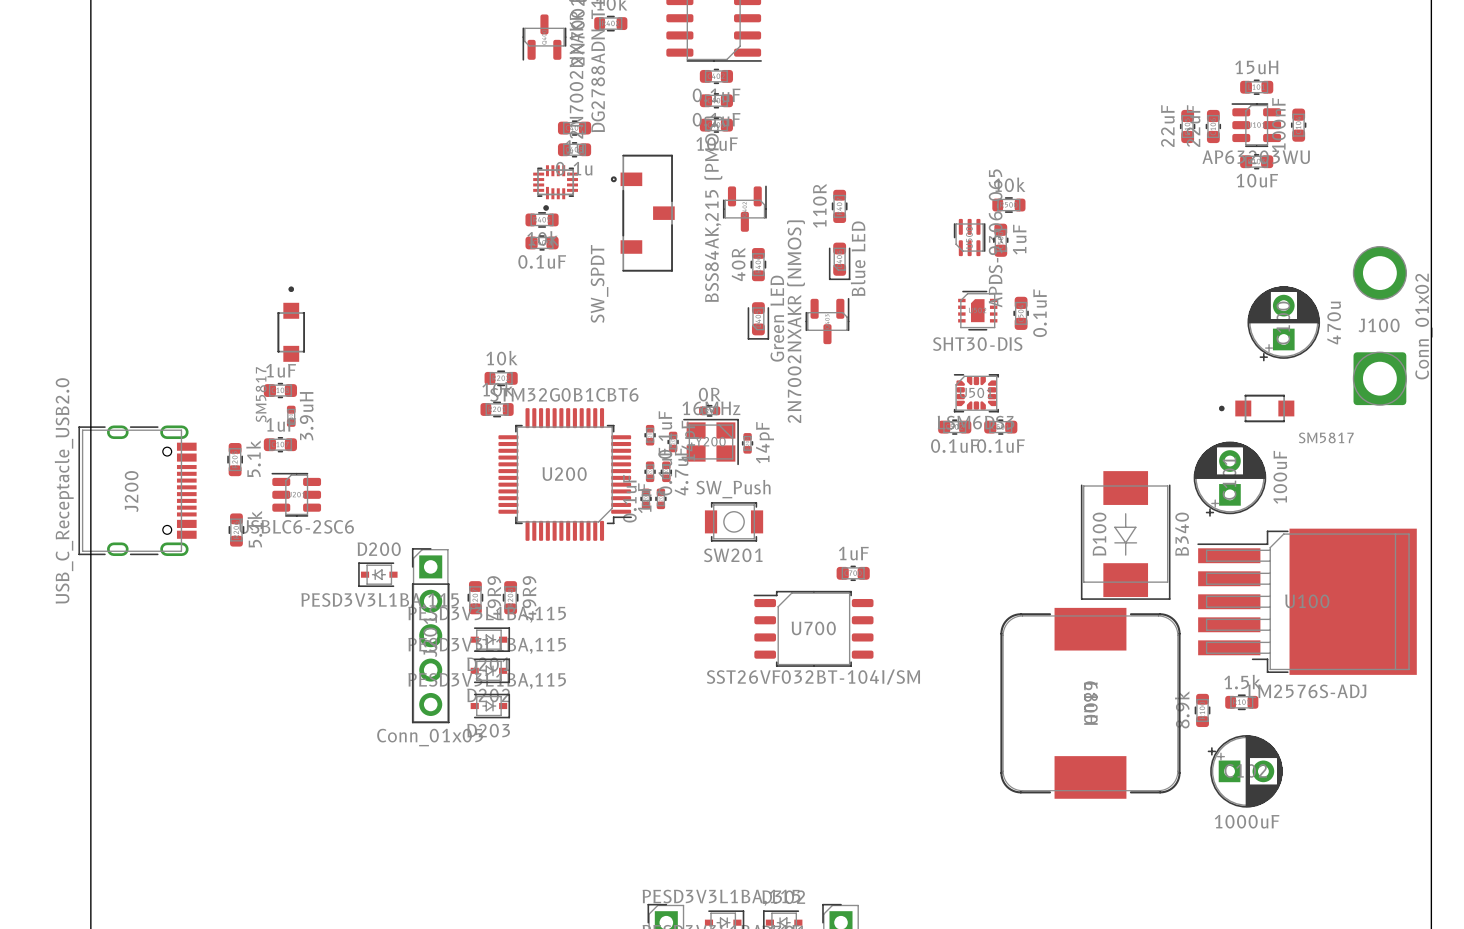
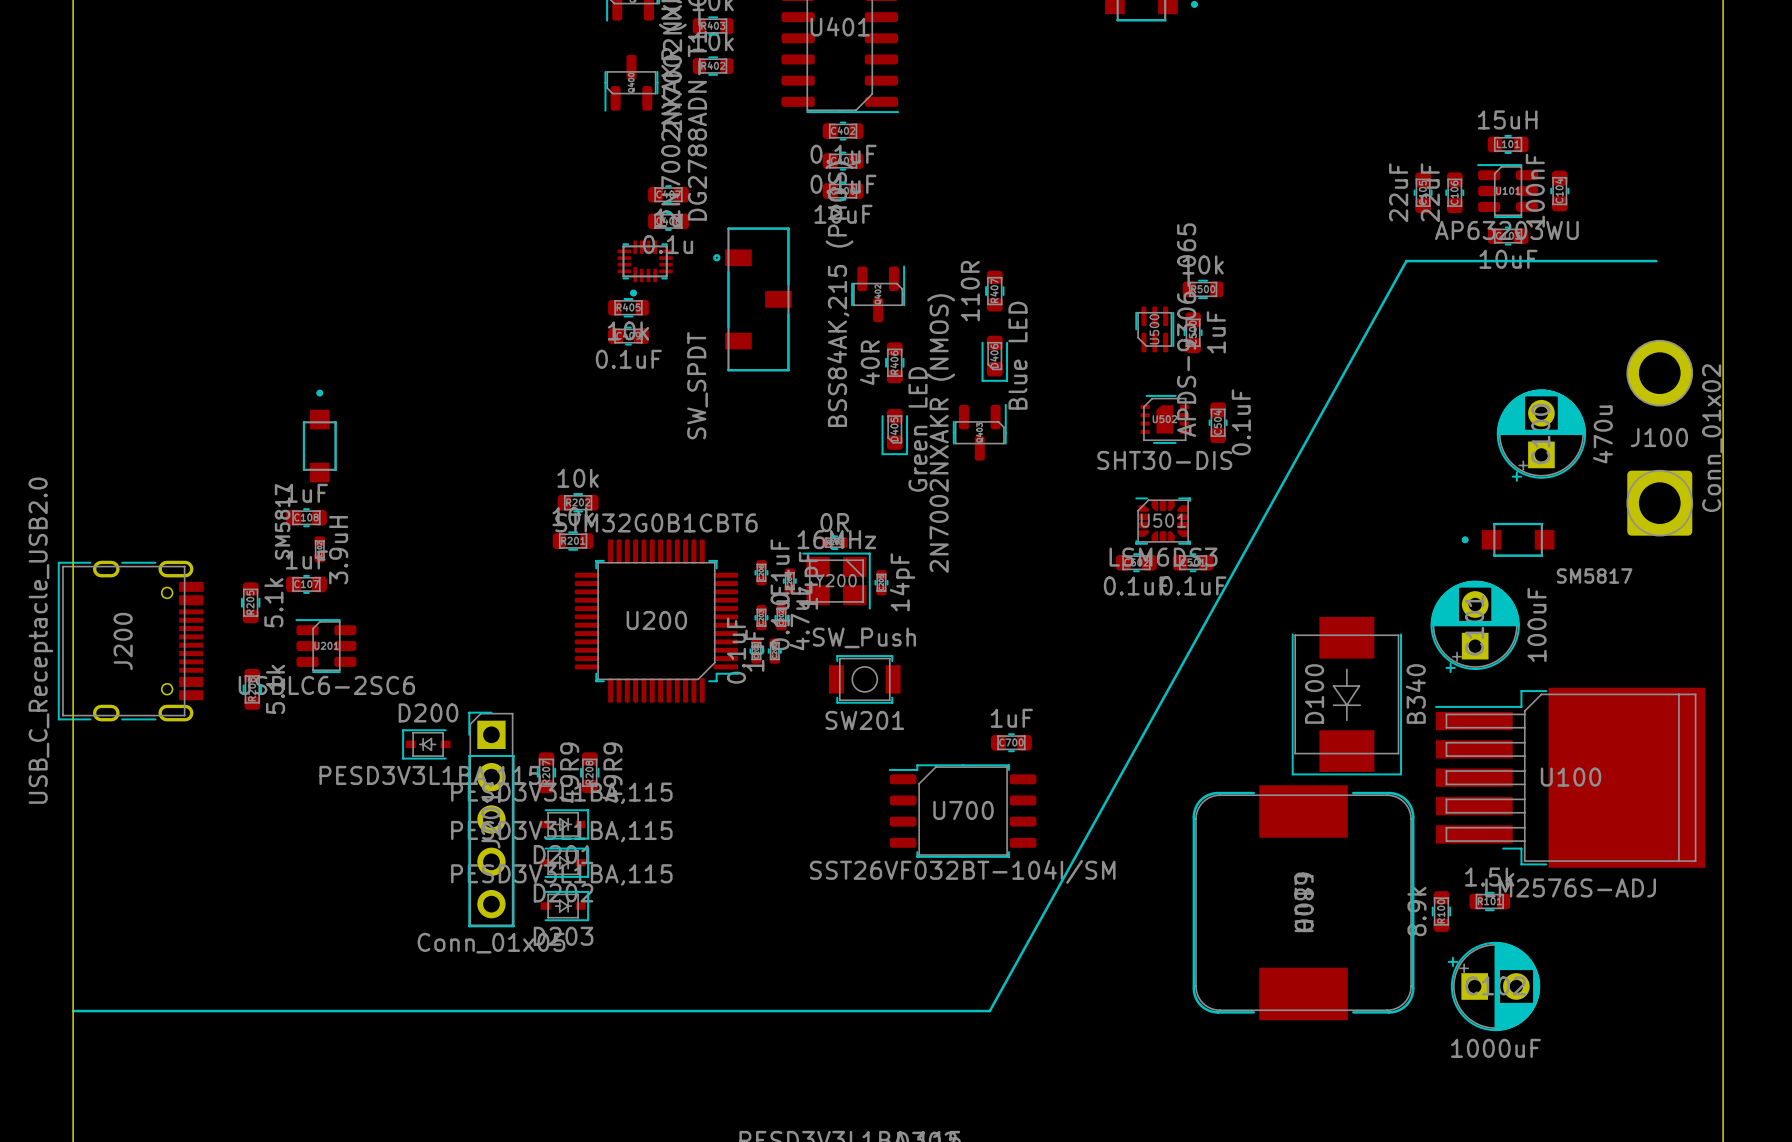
line: none -> (1656, 261) (1406, 261) (989, 1011) (73, 1011)

